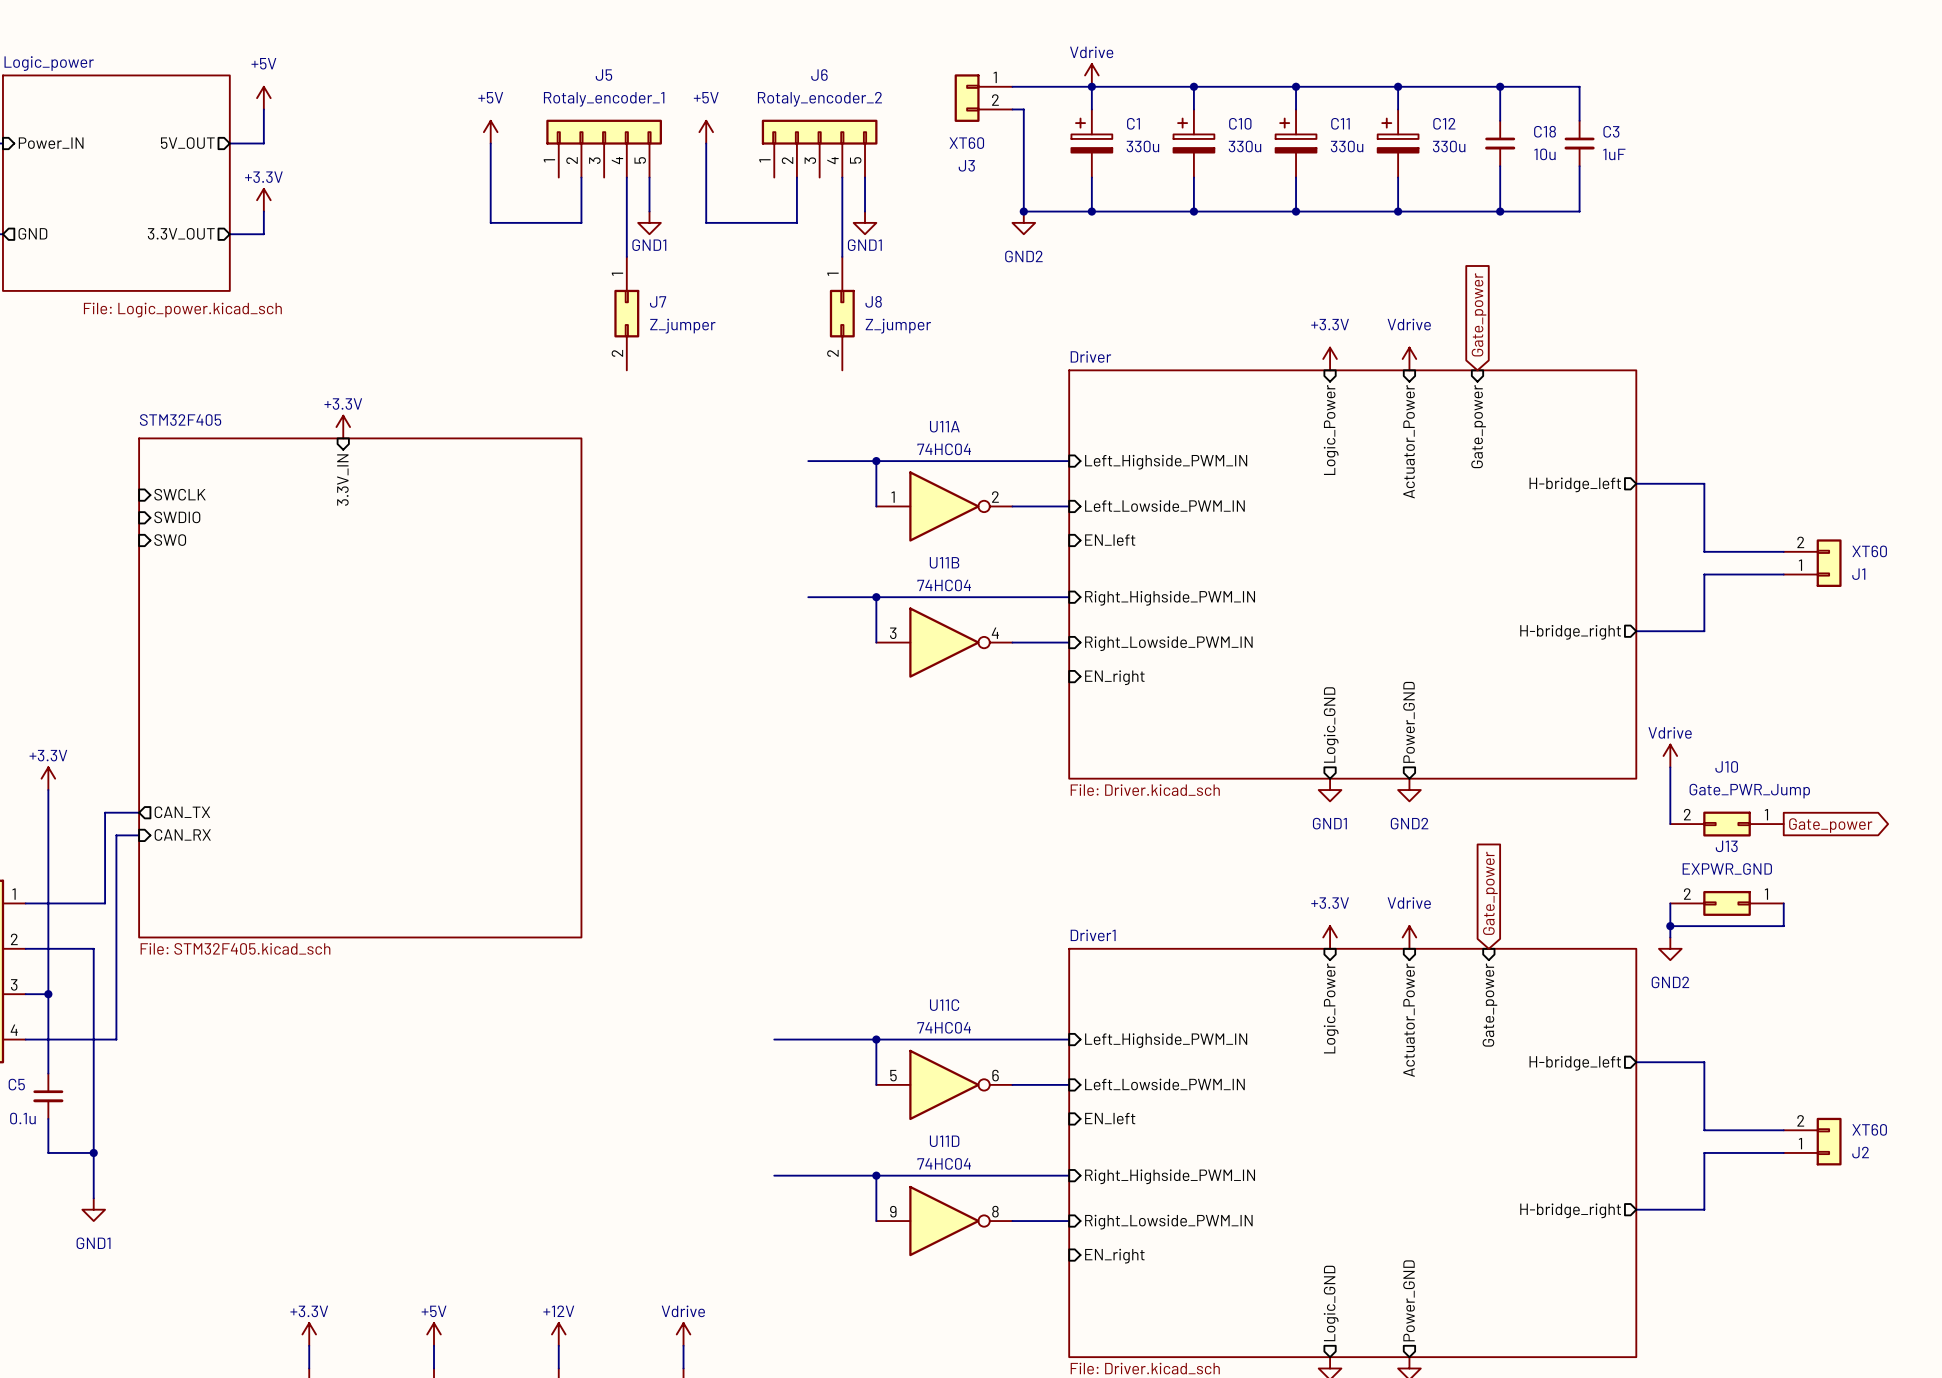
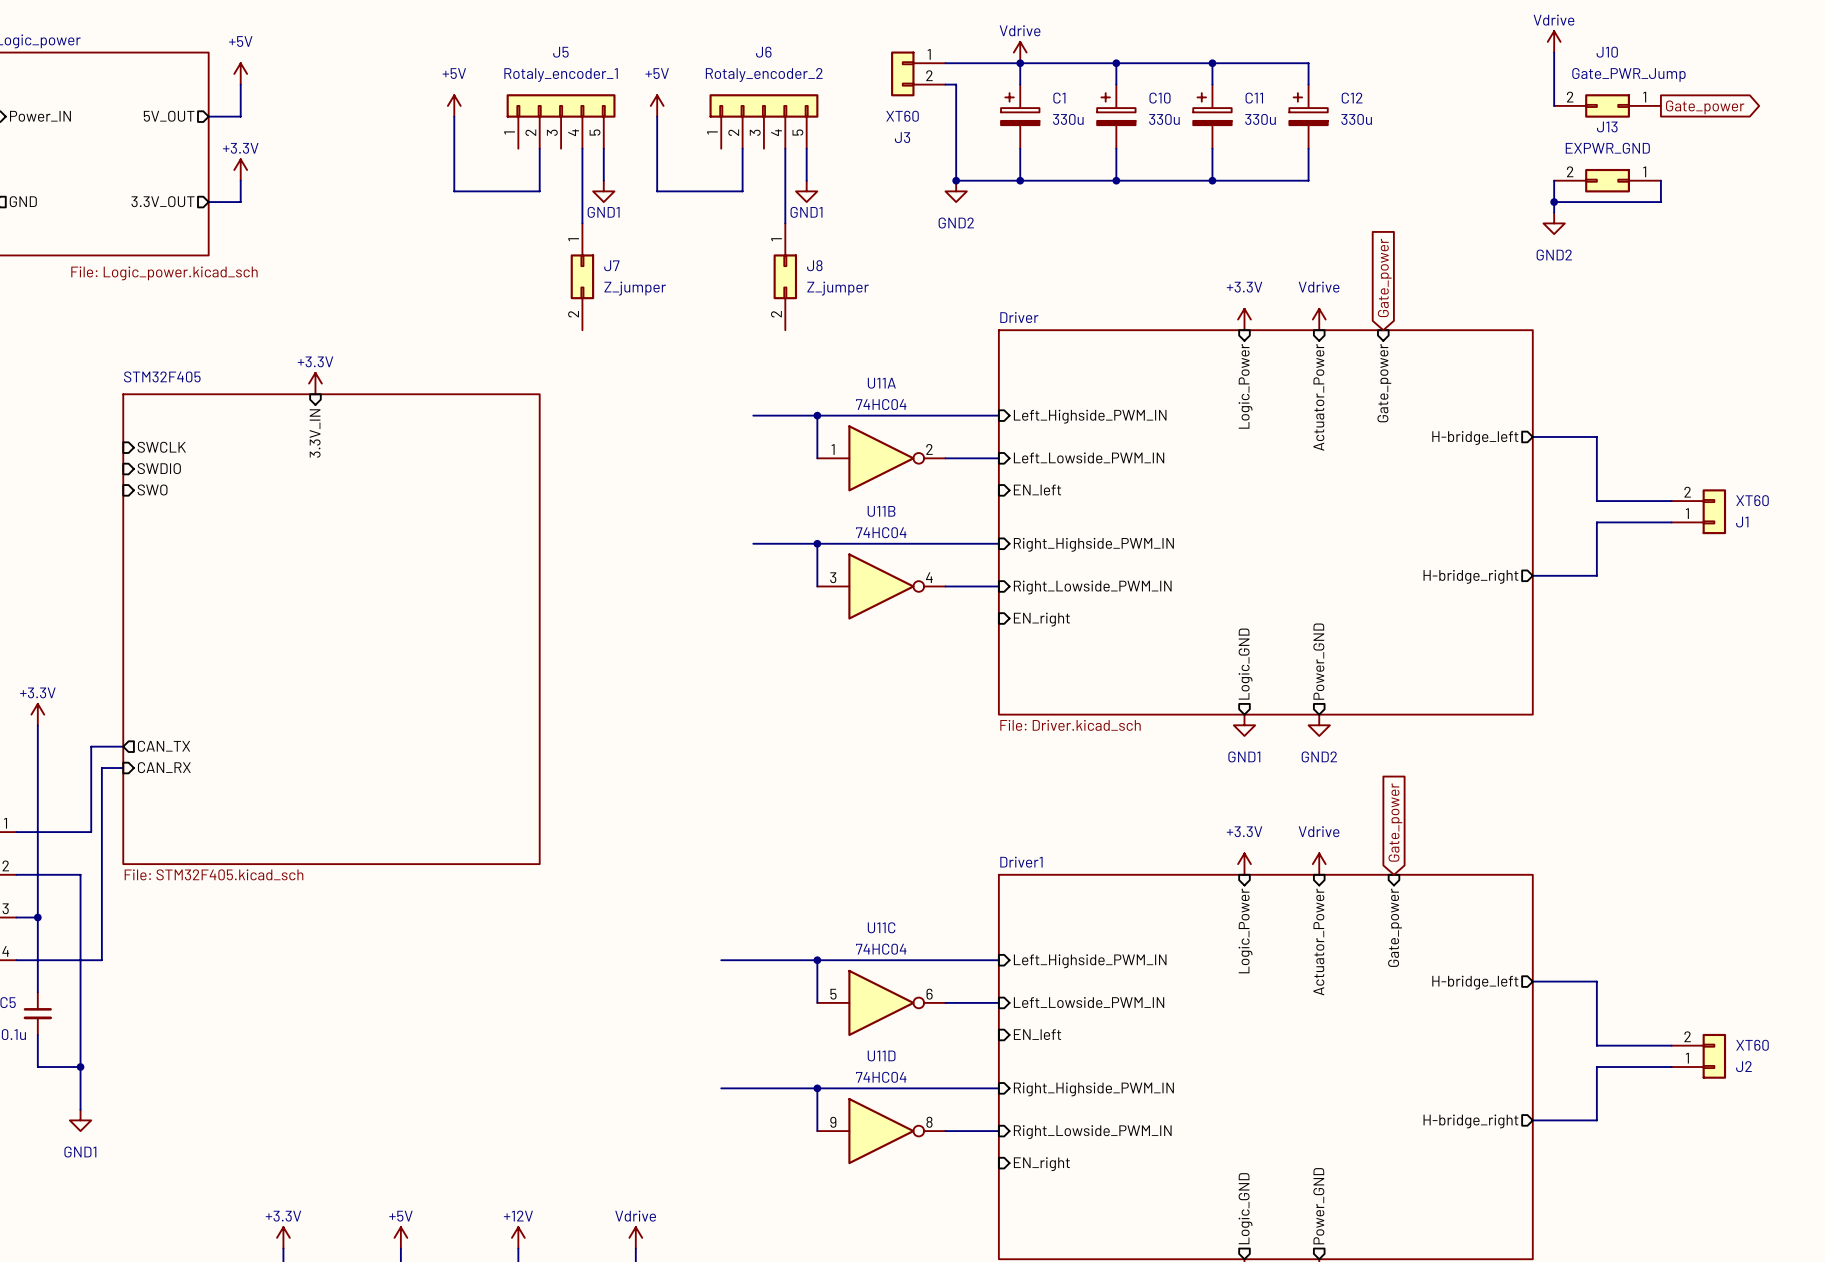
power symbol: none -> Vdrive (1554, 41)
wire: none -> (1554, 52) (1554, 105)
wire: (1398, 86) (1579, 86) (1579, 120) -> none
junction: (1398, 86) -> none
wire: (1500, 86) (1500, 120) -> (1554, 180) (1554, 212)
junction: (1500, 86) -> none
global label: none -> Gate_power (1705, 107)
C18: 10u (1500, 143) -> none
C3: 1uF (1579, 143) -> none
wire: (1500, 166) (1500, 211) -> none
wire: (1579, 166) (1579, 211) (1398, 211) -> none
junction: (1398, 211) -> none
junction: (1500, 211) -> none
wire: none -> (1660, 180) (1660, 202) (1554, 202)
junction: none -> (1554, 202)
power symbol: none -> GND2 (1554, 223)
power symbol: Vdrive (1670, 755) -> none
wire: (1670, 767) (1670, 824) -> none
J10 position: (1727, 824) -> (1607, 105)
global label: Gate_power (1830, 825) -> none
wire: (1670, 903) (1670, 937) -> none
J13 position: (1727, 903) -> (1607, 180)
wire: (1783, 903) (1783, 926) (1670, 926) -> none
junction: (1670, 926) -> none
power symbol: GND2 (1670, 948) -> none

